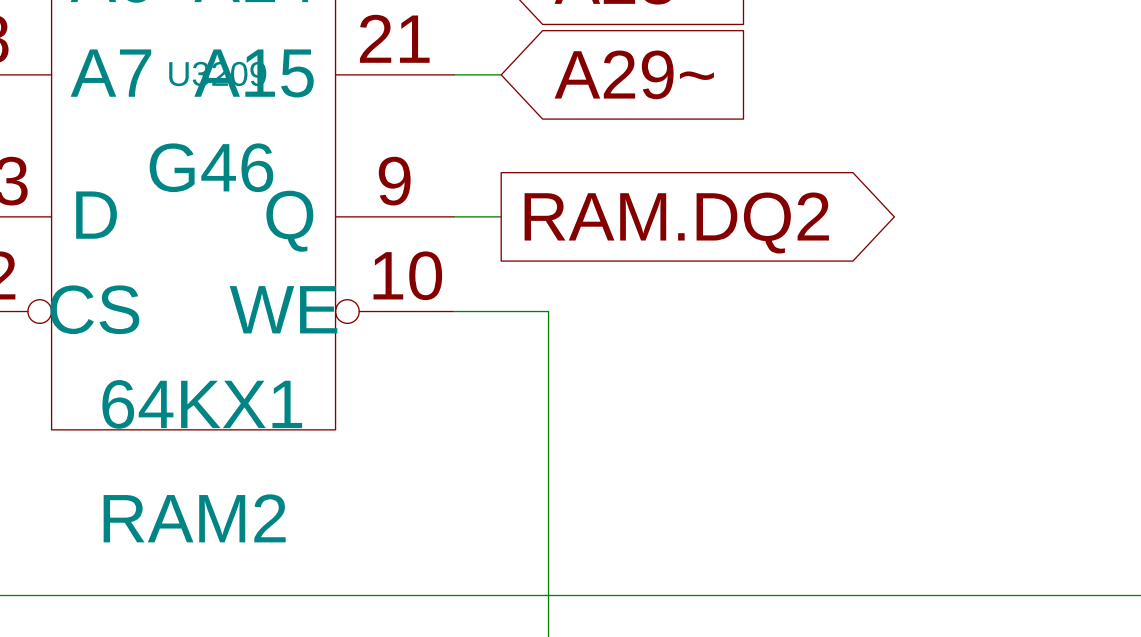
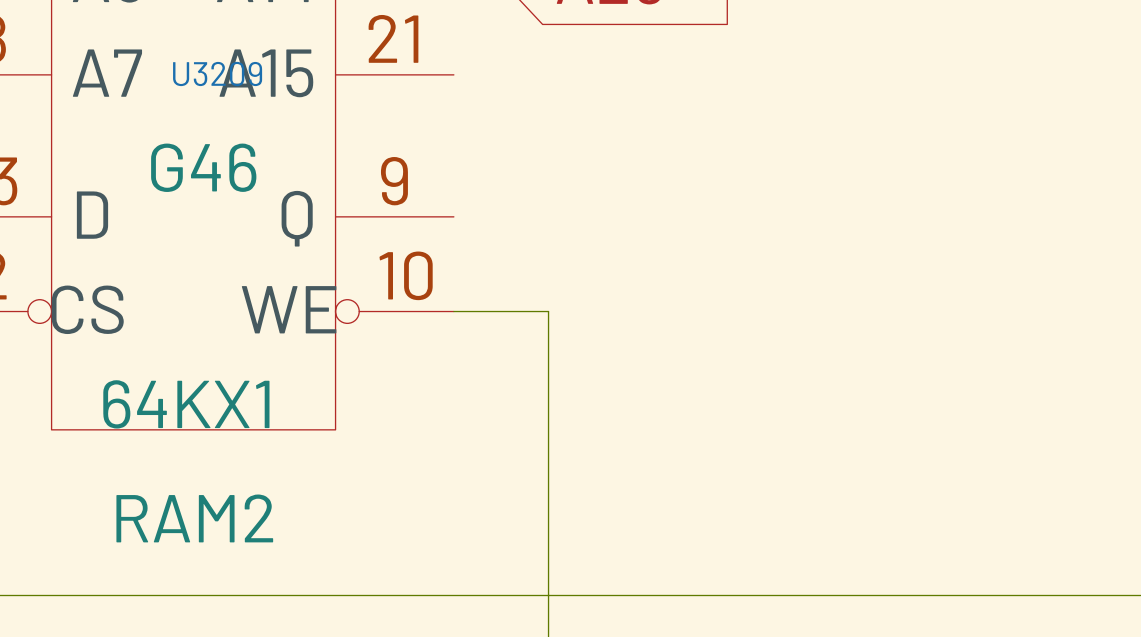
wire: (453, 74) (501, 74) -> none
global label: A29~ (634, 74) -> none
wire: (453, 216) (501, 216) -> none
global label: RAM.DQ2 (676, 223) -> none

